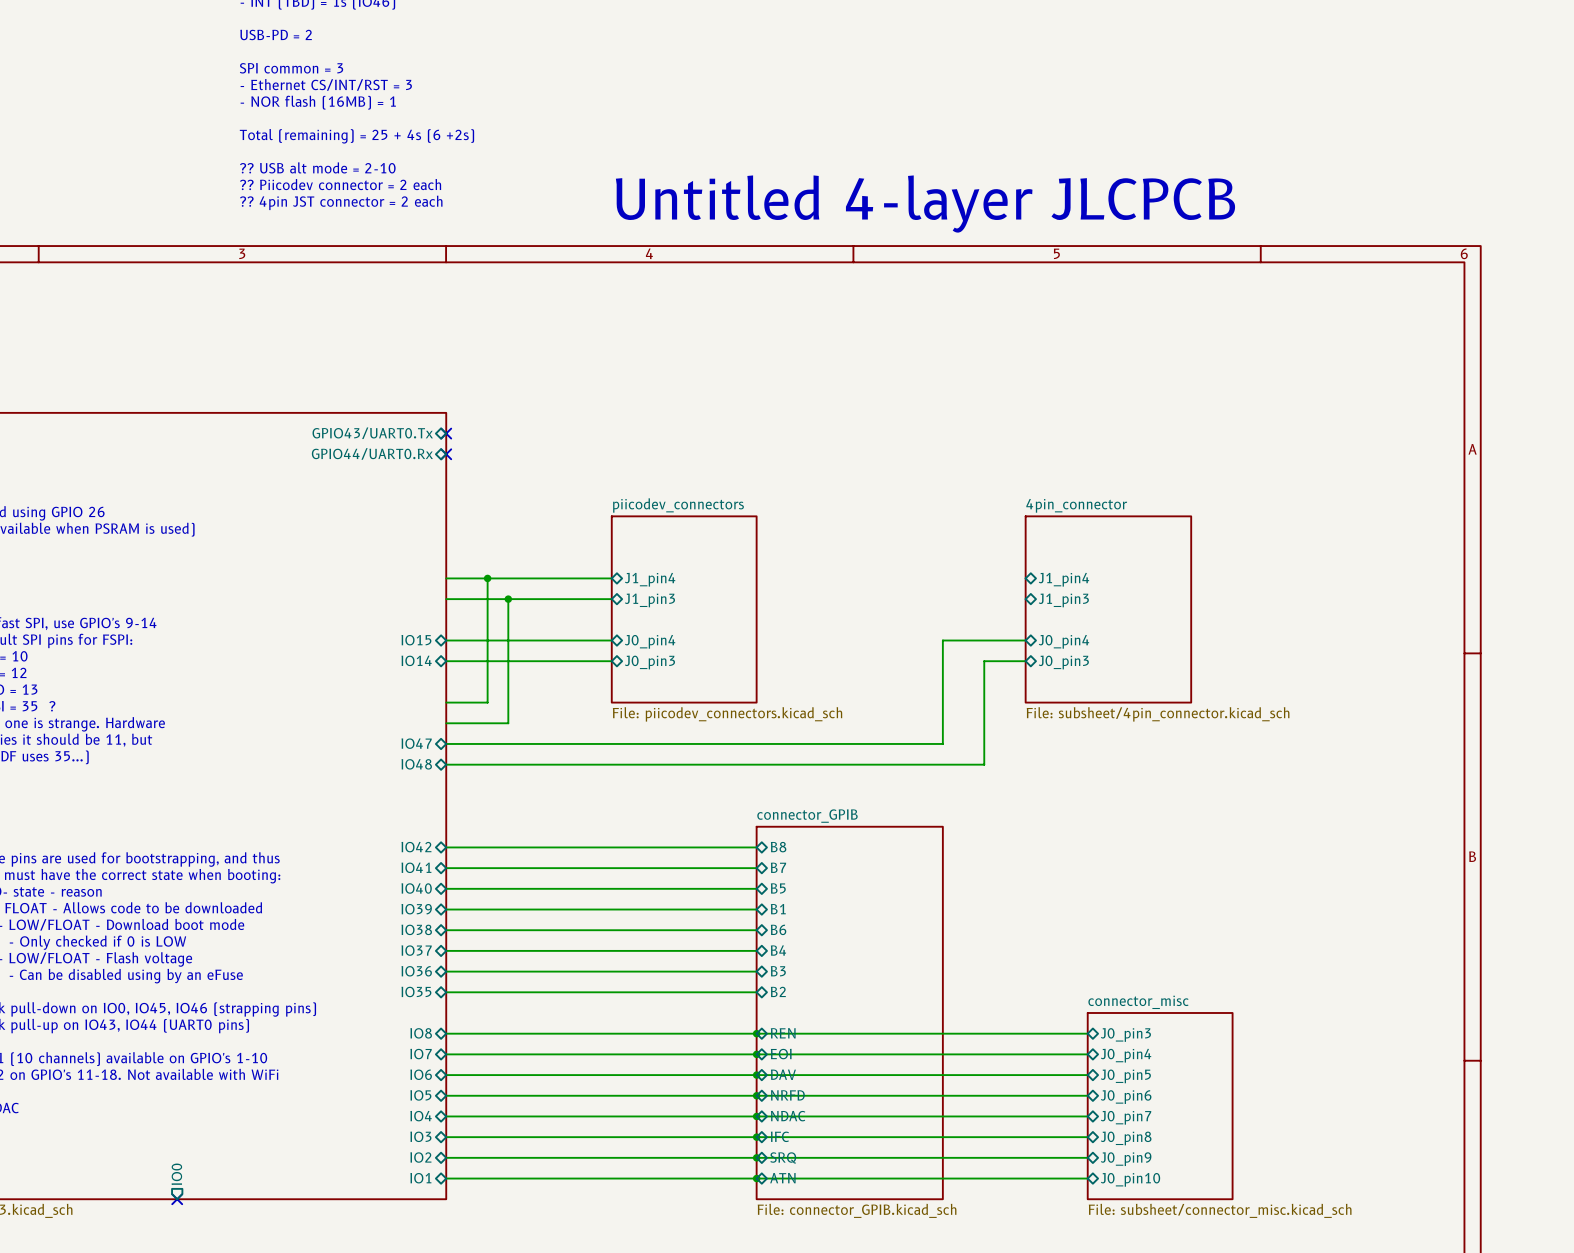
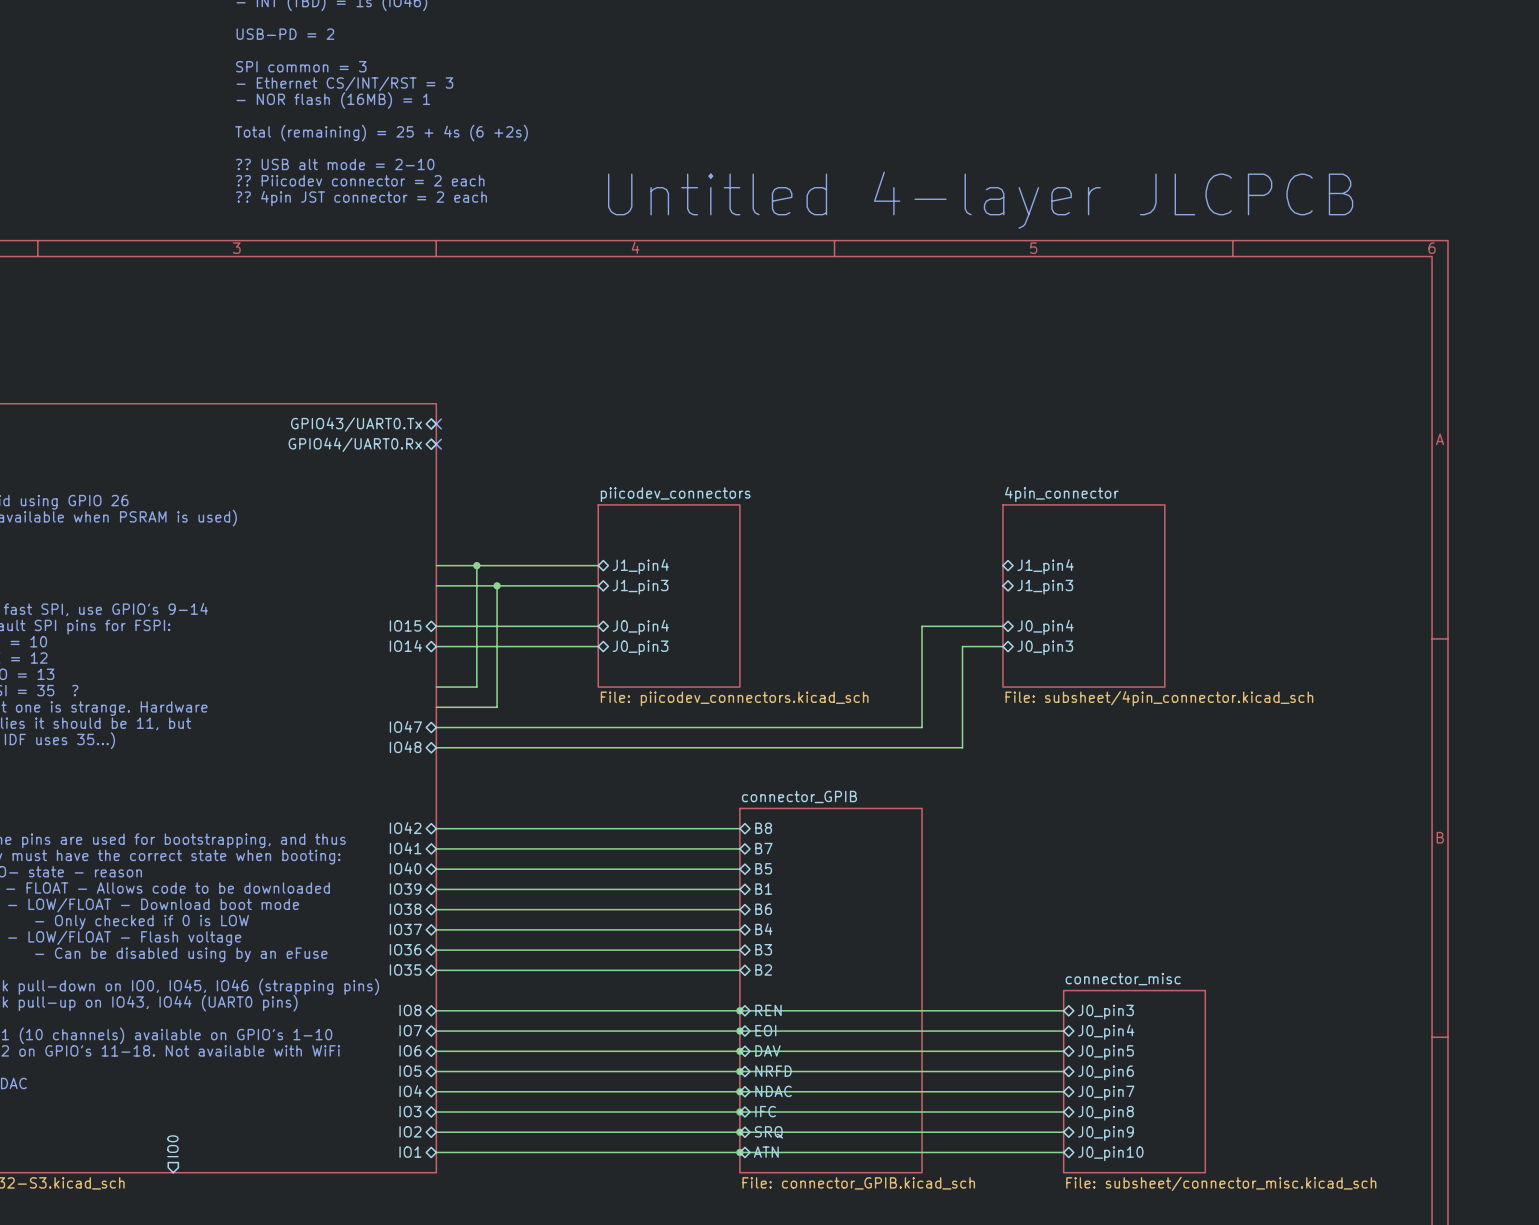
no-connect mark: (177, 1199) -> none

